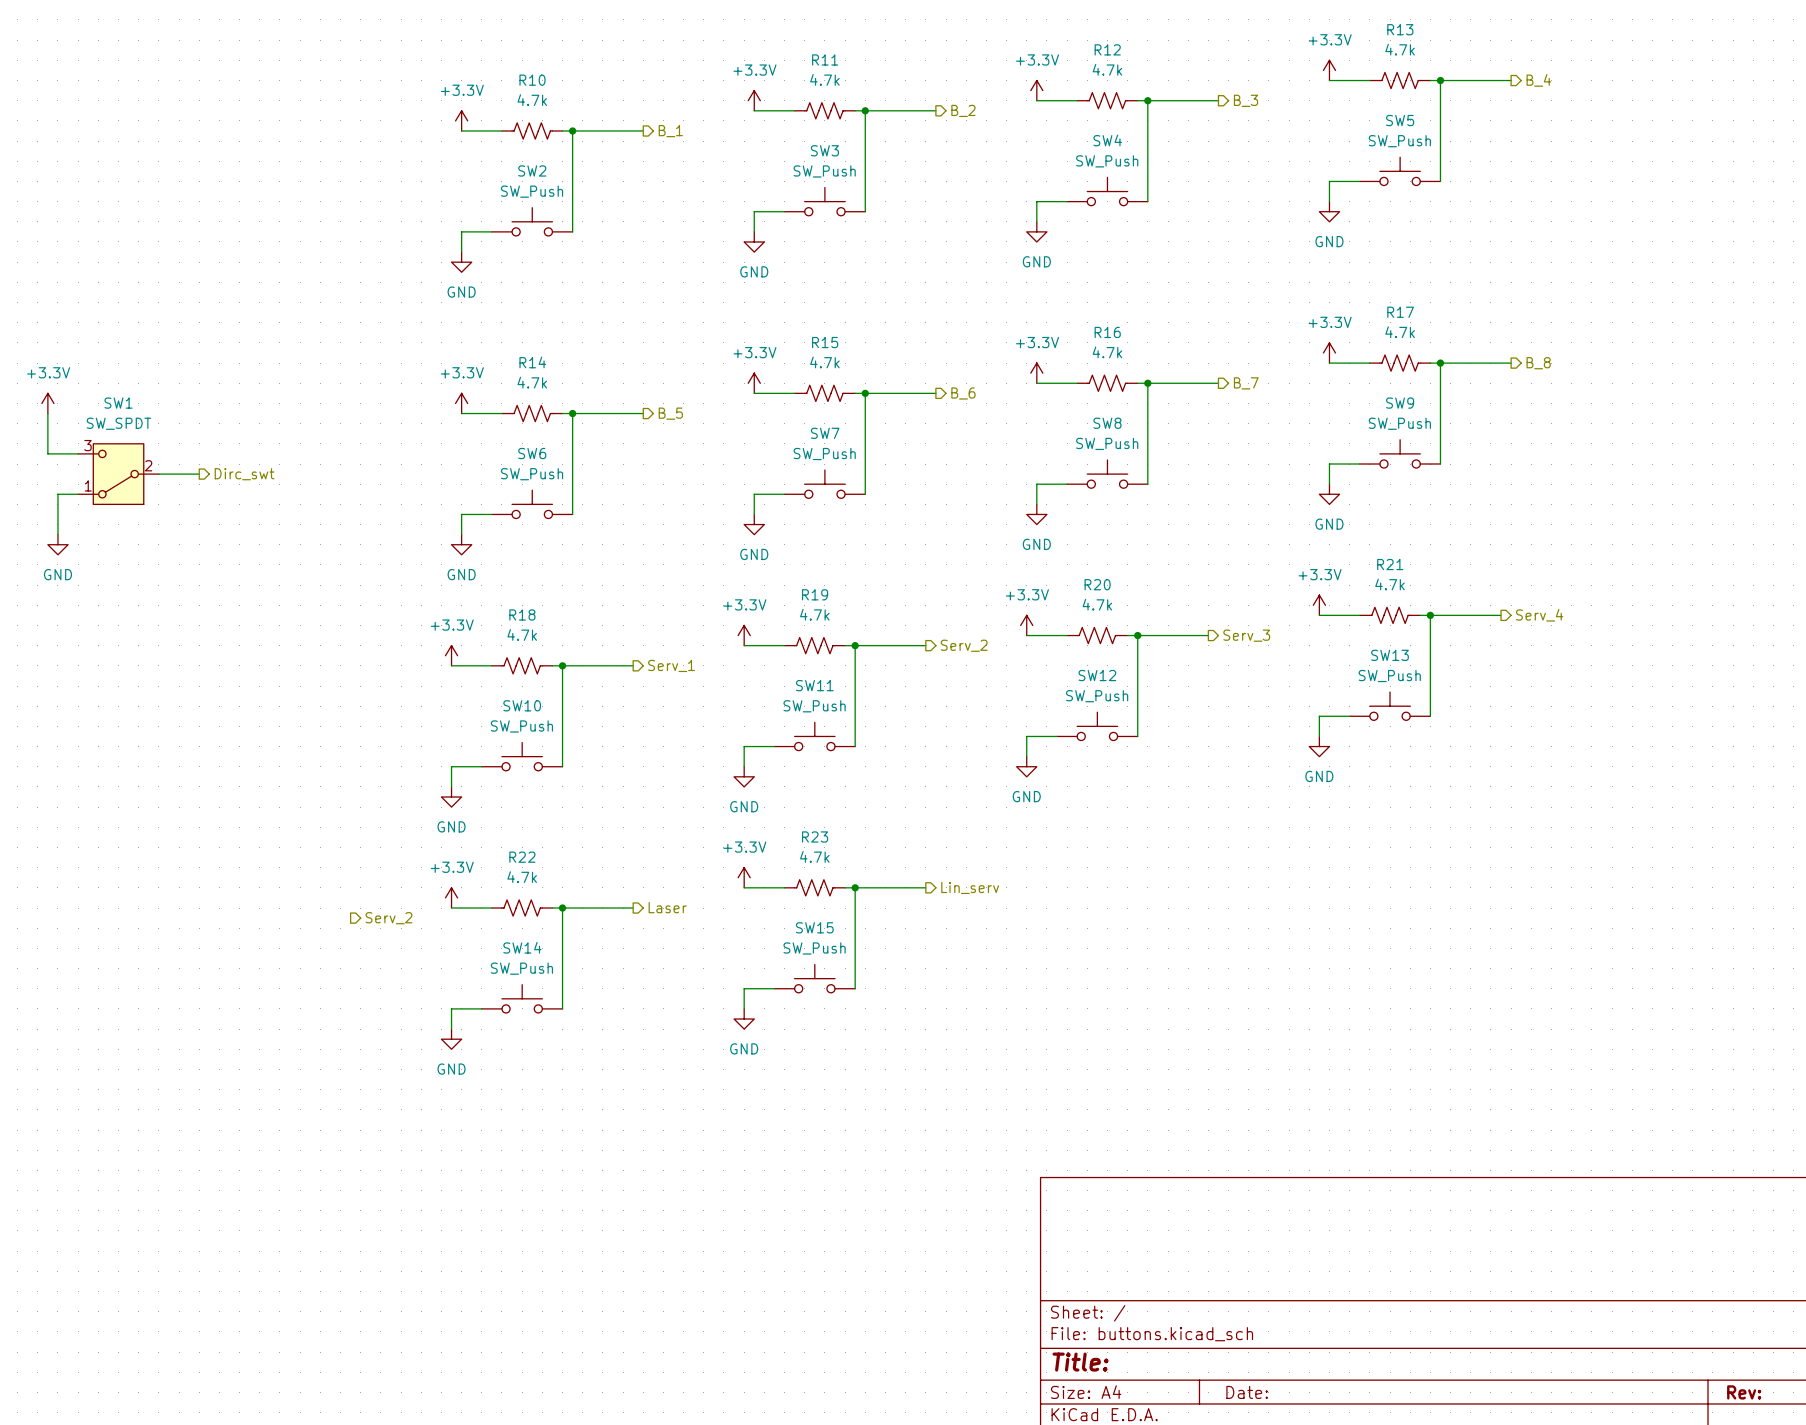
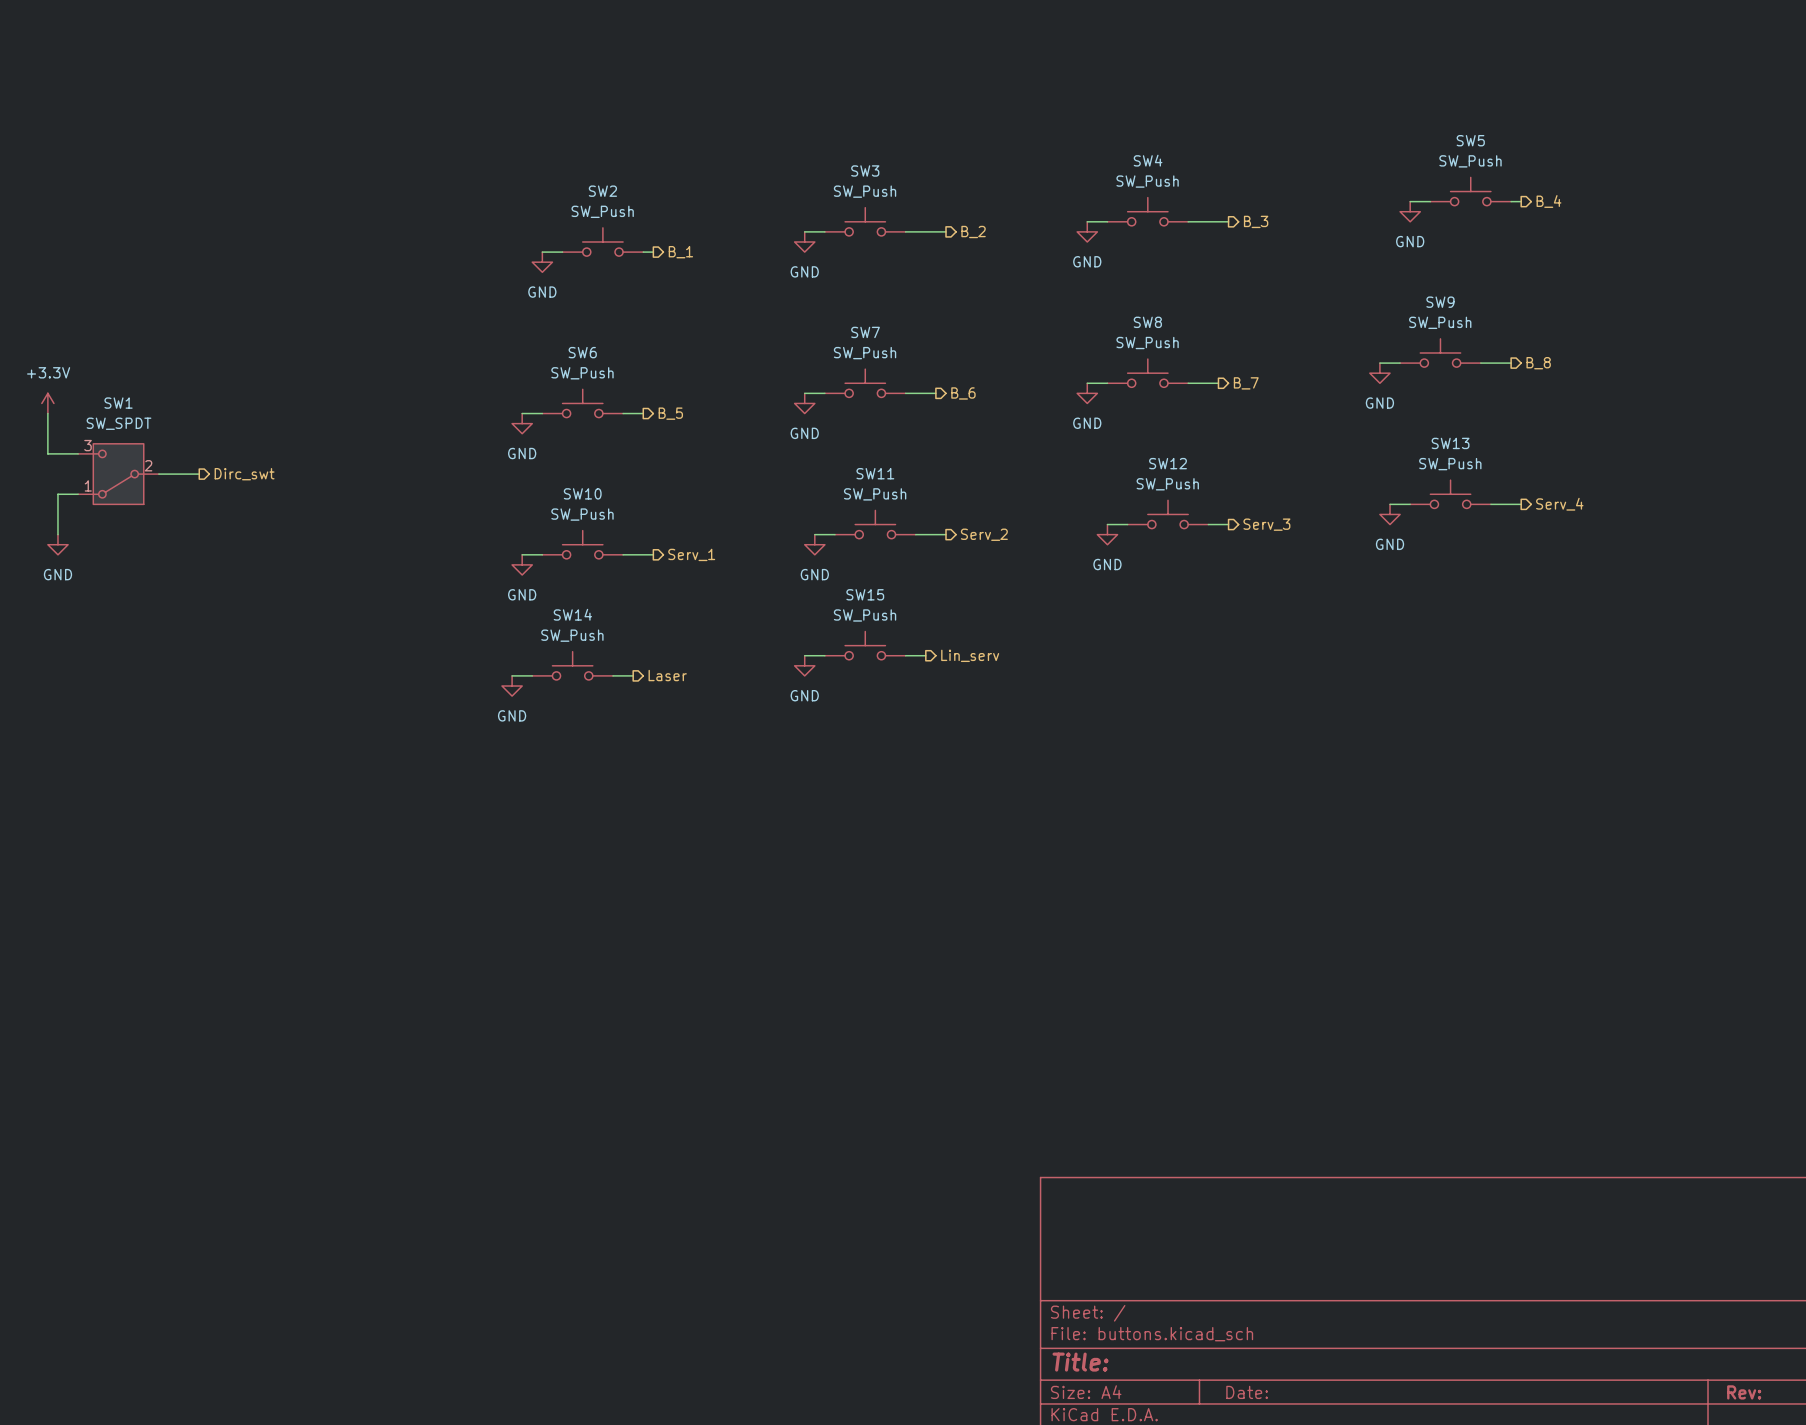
power symbol: +3.3V (1329, 70) -> none
wire: (1329, 80) (1369, 80) -> none
R13: 4.7k (1400, 80) -> none
wire: (1430, 80) (1511, 80) -> none
wire: (1440, 80) (1440, 181) -> none
junction: (1440, 80) -> none
hierarchical label position: B_4 (1538, 80) -> B_4 (1548, 201)
power symbol: +3.3V (1036, 90) -> none
power symbol: +3.3V (754, 100) -> none
wire: (1036, 100) (1077, 100) -> (1188, 221) (1228, 221)
R12: 4.7k (1107, 100) -> none
wire: (1137, 100) (1218, 100) -> none
wire: (1147, 100) (1147, 201) -> none
junction: (1147, 100) -> none
hierarchical label position: B_3 (1246, 100) -> B_3 (1256, 221)
wire: (754, 110) (794, 110) -> (905, 231) (946, 231)
R11: 4.7k (824, 110) -> none
wire: (855, 110) (935, 110) -> none
wire: (865, 110) (865, 211) -> none
junction: (865, 110) -> none
hierarchical label position: B_2 (963, 110) -> B_2 (973, 232)
power symbol: +3.3V (461, 120) -> none
wire: (461, 130) (501, 130) -> none
R10: 4.7k (532, 130) -> none
wire: (562, 130) (643, 130) -> none
wire: (572, 130) (572, 231) -> none
junction: (572, 130) -> none
hierarchical label position: B_1 (670, 131) -> B_1 (680, 252)
SW5 position: (1400, 171) -> (1470, 191)
wire: (1359, 181) (1329, 181) (1329, 201) -> none
SW4 position: (1107, 191) -> (1147, 211)
SW3 position: (824, 201) -> (865, 221)
wire: (1067, 201) (1036, 201) (1036, 221) -> none
wire: none -> (1410, 201) (1430, 201)
wire: none -> (1511, 201) (1521, 201)
wire: (784, 211) (754, 211) (754, 231) -> none
power symbol position: GND (1329, 211) -> GND (1410, 211)
SW2 position: (532, 221) -> (602, 241)
wire: none -> (1087, 221) (1107, 221)
wire: (491, 231) (461, 231) (461, 252) -> none
wire: none -> (804, 231) (824, 231)
power symbol position: GND (1036, 231) -> GND (1087, 231)
power symbol position: GND (754, 241) -> GND (804, 241)
wire: none -> (542, 252) (562, 252)
wire: none -> (643, 252) (653, 252)
power symbol position: GND (461, 262) -> GND (542, 262)
power symbol: +3.3V (1329, 352) -> none
wire: (1329, 363) (1369, 363) -> none
wire: none -> (1379, 363) (1400, 363)
R17: 4.7k (1400, 363) -> none
wire: (1430, 363) (1480, 363) -> none
wire: (1440, 363) (1440, 464) -> none
junction: (1440, 363) -> none
power symbol: +3.3V (1036, 373) -> none
power symbol: none -> GND (1379, 373)
power symbol: +3.3V (754, 383) -> none
wire: (1036, 383) (1077, 383) -> none
wire: none -> (1087, 383) (1107, 383)
R16: 4.7k (1107, 383) -> none
wire: (1137, 383) (1188, 383) -> none
wire: (1147, 383) (1147, 484) -> none
junction: (1147, 383) -> none
wire: (754, 393) (794, 393) -> none
wire: none -> (804, 393) (824, 393)
R15: 4.7k (824, 393) -> none
wire: (855, 393) (905, 393) -> none
wire: (865, 393) (865, 494) -> none
junction: (865, 393) -> none
power symbol: none -> GND (1087, 393)
power symbol: +3.3V (461, 403) -> none
power symbol: none -> GND (804, 403)
wire: (461, 413) (501, 413) -> none
wire: none -> (522, 413) (542, 413)
R14: 4.7k (532, 413) -> none
wire: (562, 413) (623, 413) -> none
wire: (572, 413) (572, 514) -> none
junction: (572, 413) -> none
power symbol: none -> GND (522, 423)
SW9 position: (1400, 453) -> (1440, 352)
wire: (1359, 464) (1329, 464) (1329, 484) -> none
SW8 position: (1107, 474) -> (1147, 373)
SW7 position: (824, 484) -> (865, 383)
wire: (1067, 484) (1036, 484) (1036, 504) -> none
wire: (784, 494) (754, 494) (754, 514) -> none
power symbol position: GND (1329, 494) -> GND (1390, 514)
SW6 position: (532, 504) -> (582, 403)
wire: none -> (1390, 504) (1410, 504)
wire: none -> (1490, 504) (1521, 504)
wire: (491, 514) (461, 514) (461, 534) -> none
power symbol: GND (1036, 514) -> none
power symbol position: GND (754, 524) -> GND (814, 544)
wire: none -> (1107, 524) (1127, 524)
wire: none -> (1208, 524) (1228, 524)
wire: none -> (814, 534) (835, 534)
wire: none -> (915, 534) (946, 534)
power symbol: none -> GND (1107, 534)
power symbol position: GND (461, 544) -> GND (522, 564)
wire: none -> (522, 554) (542, 554)
wire: none -> (623, 554) (653, 554)
power symbol: +3.3V (1319, 605) -> none
wire: (1319, 615) (1359, 615) -> none
R21: 4.7k (1390, 615) -> none
wire: (1420, 615) (1501, 615) -> none
wire: (1430, 615) (1430, 716) -> none
junction: (1430, 615) -> none
hierarchical label position: Serv_4 (1539, 615) -> Serv_4 (1559, 504)
power symbol: +3.3V (1026, 625) -> none
power symbol: +3.3V (744, 635) -> none
wire: (1026, 635) (1067, 635) -> none
R20: 4.7k (1097, 635) -> none
wire: (1127, 635) (1208, 635) -> none
wire: (1137, 635) (1137, 736) -> none
junction: (1137, 635) -> none
hierarchical label position: Serv_3 (1246, 635) -> Serv_3 (1266, 524)
wire: (744, 645) (784, 645) -> none
R19: 4.7k (814, 645) -> none
wire: (845, 645) (925, 645) -> none
wire: (855, 645) (855, 746) -> none
junction: (855, 645) -> none
hierarchical label position: Serv_2 (964, 645) -> Serv_2 (984, 534)
power symbol: +3.3V (451, 655) -> none
wire: none -> (804, 655) (824, 655)
wire: none -> (905, 655) (925, 655)
hierarchical label: none -> Lin_serv (970, 655)
wire: (451, 665) (491, 665) -> none
R18: 4.7k (522, 665) -> none
wire: (552, 665) (633, 665) -> none
wire: (562, 665) (562, 766) -> none
junction: (562, 665) -> none
hierarchical label position: Serv_1 (671, 665) -> Serv_1 (691, 554)
power symbol: none -> GND (804, 665)
wire: none -> (512, 675) (532, 675)
wire: none -> (612, 675) (633, 675)
hierarchical label: none -> Laser (667, 675)
power symbol: none -> GND (512, 686)
SW13 position: (1390, 706) -> (1450, 494)
wire: (1349, 716) (1319, 716) (1319, 736) -> none
SW12 position: (1097, 726) -> (1168, 514)
SW11 position: (814, 736) -> (875, 524)
wire: (1057, 736) (1026, 736) (1026, 756) -> none
wire: (774, 746) (744, 746) (744, 766) -> none
power symbol: GND (1319, 746) -> none
SW10 position: (522, 756) -> (582, 544)
wire: (481, 766) (451, 766) (451, 786) -> none
power symbol: GND (1026, 766) -> none
power symbol: GND (744, 776) -> none
power symbol: GND (451, 797) -> none
power symbol: +3.3V (744, 877) -> none
wire: (744, 887) (784, 887) -> none
R23: 4.7k (814, 887) -> none
wire: (845, 887) (925, 887) -> none
wire: (855, 887) (855, 988) -> none
junction: (855, 887) -> none
hierarchical label: Lin_serv (970, 887) -> none
power symbol: +3.3V (451, 897) -> none
hierarchical label: Laser (667, 907) -> none
wire: (451, 908) (491, 908) -> none
R22: 4.7k (522, 908) -> none
wire: (552, 908) (633, 908) -> none
wire: (562, 908) (562, 1008) -> none
junction: (562, 908) -> none
hierarchical label: Serv_2 (388, 918) -> none
SW15 position: (814, 978) -> (865, 645)
wire: (774, 988) (744, 988) (744, 1008) -> none
SW14 position: (522, 998) -> (572, 665)
wire: (481, 1008) (451, 1008) (451, 1029) -> none
power symbol: GND (744, 1019) -> none
power symbol: GND (451, 1039) -> none

